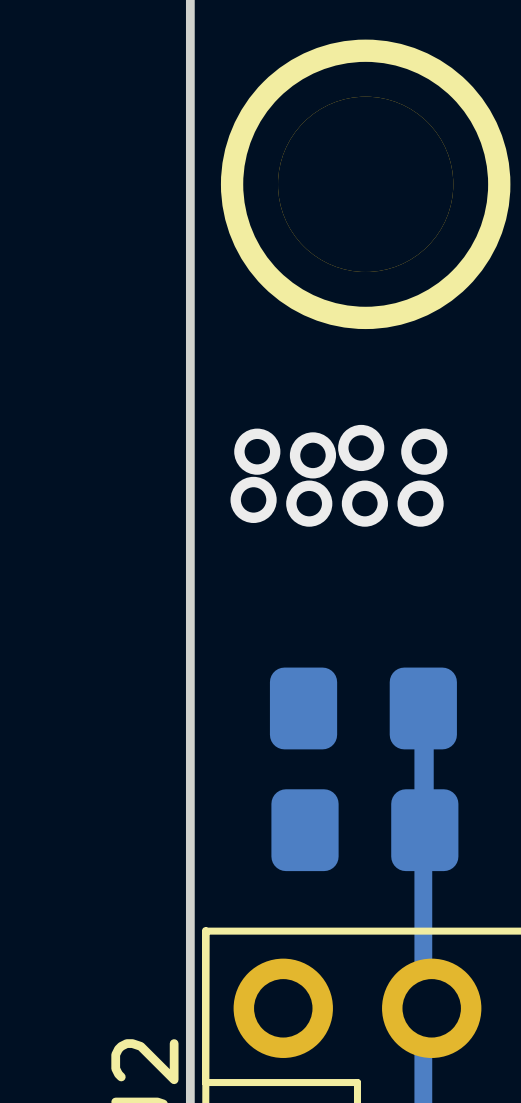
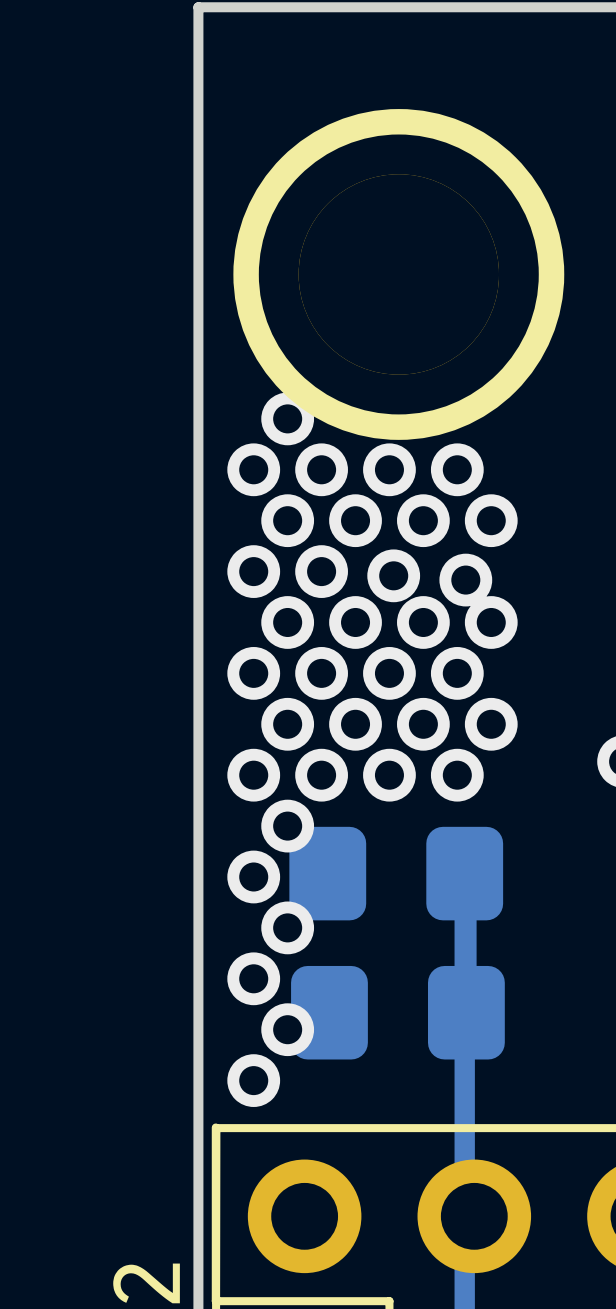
via: none -> (287, 418)
via: none -> (253, 469)
via: none -> (321, 469)
via: none -> (389, 469)
via: none -> (457, 469)
via: none -> (287, 520)
via: none -> (355, 520)
via: none -> (423, 520)
via: none -> (491, 520)
via: none -> (253, 571)
via: none -> (321, 571)
via: (257, 451) -> none
via: (312, 455) -> none
via: none -> (287, 622)
via: none -> (355, 622)
via: none -> (423, 622)
via: none -> (491, 622)
via: (253, 499) -> none
via: (309, 503) -> none
via: (364, 503) -> none
via: (420, 503) -> none
via: none -> (253, 673)
via: none -> (321, 673)
via: none -> (389, 673)
via: none -> (457, 673)
via: none -> (287, 724)
via: none -> (355, 724)
via: none -> (423, 724)
via: none -> (491, 724)
via: none -> (253, 775)
via: none -> (321, 775)
via: none -> (389, 775)
via: none -> (457, 775)
via: none -> (287, 826)
via: none -> (253, 876)
via: none -> (287, 927)
via: none -> (253, 978)
via: none -> (287, 1029)
via: none -> (253, 1080)

